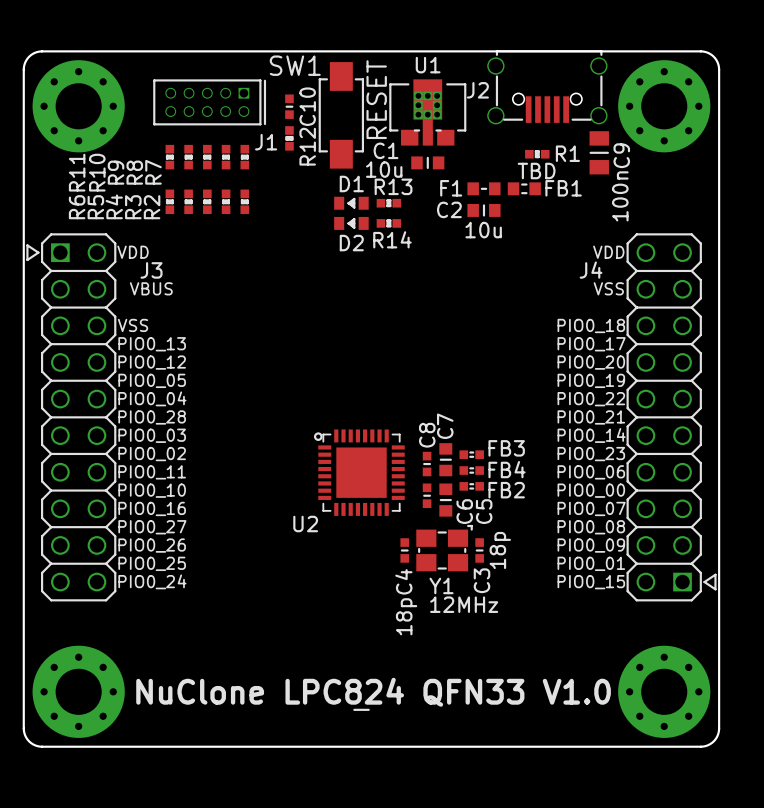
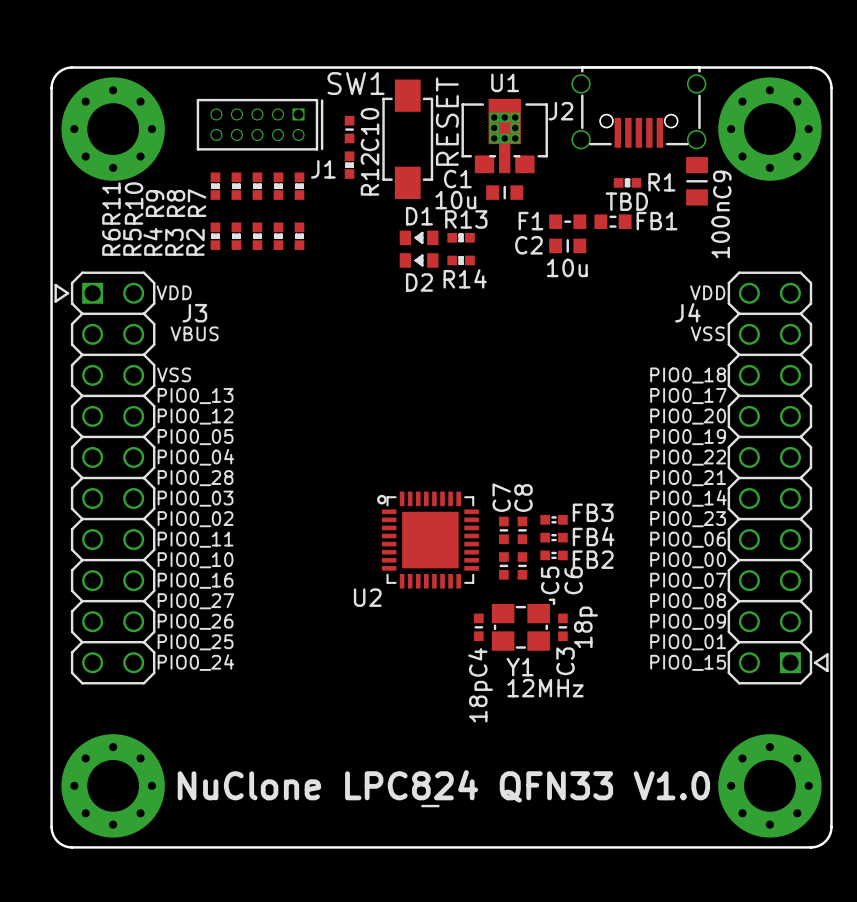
C8 name: C8 (427, 435) -> C7 (501, 497)
C7: (445, 459) -> none
C8: none -> (522, 530)
C6: none -> (522, 565)
C5: (445, 500) -> none
C6 name: C6 (464, 511) -> C5 (550, 580)

